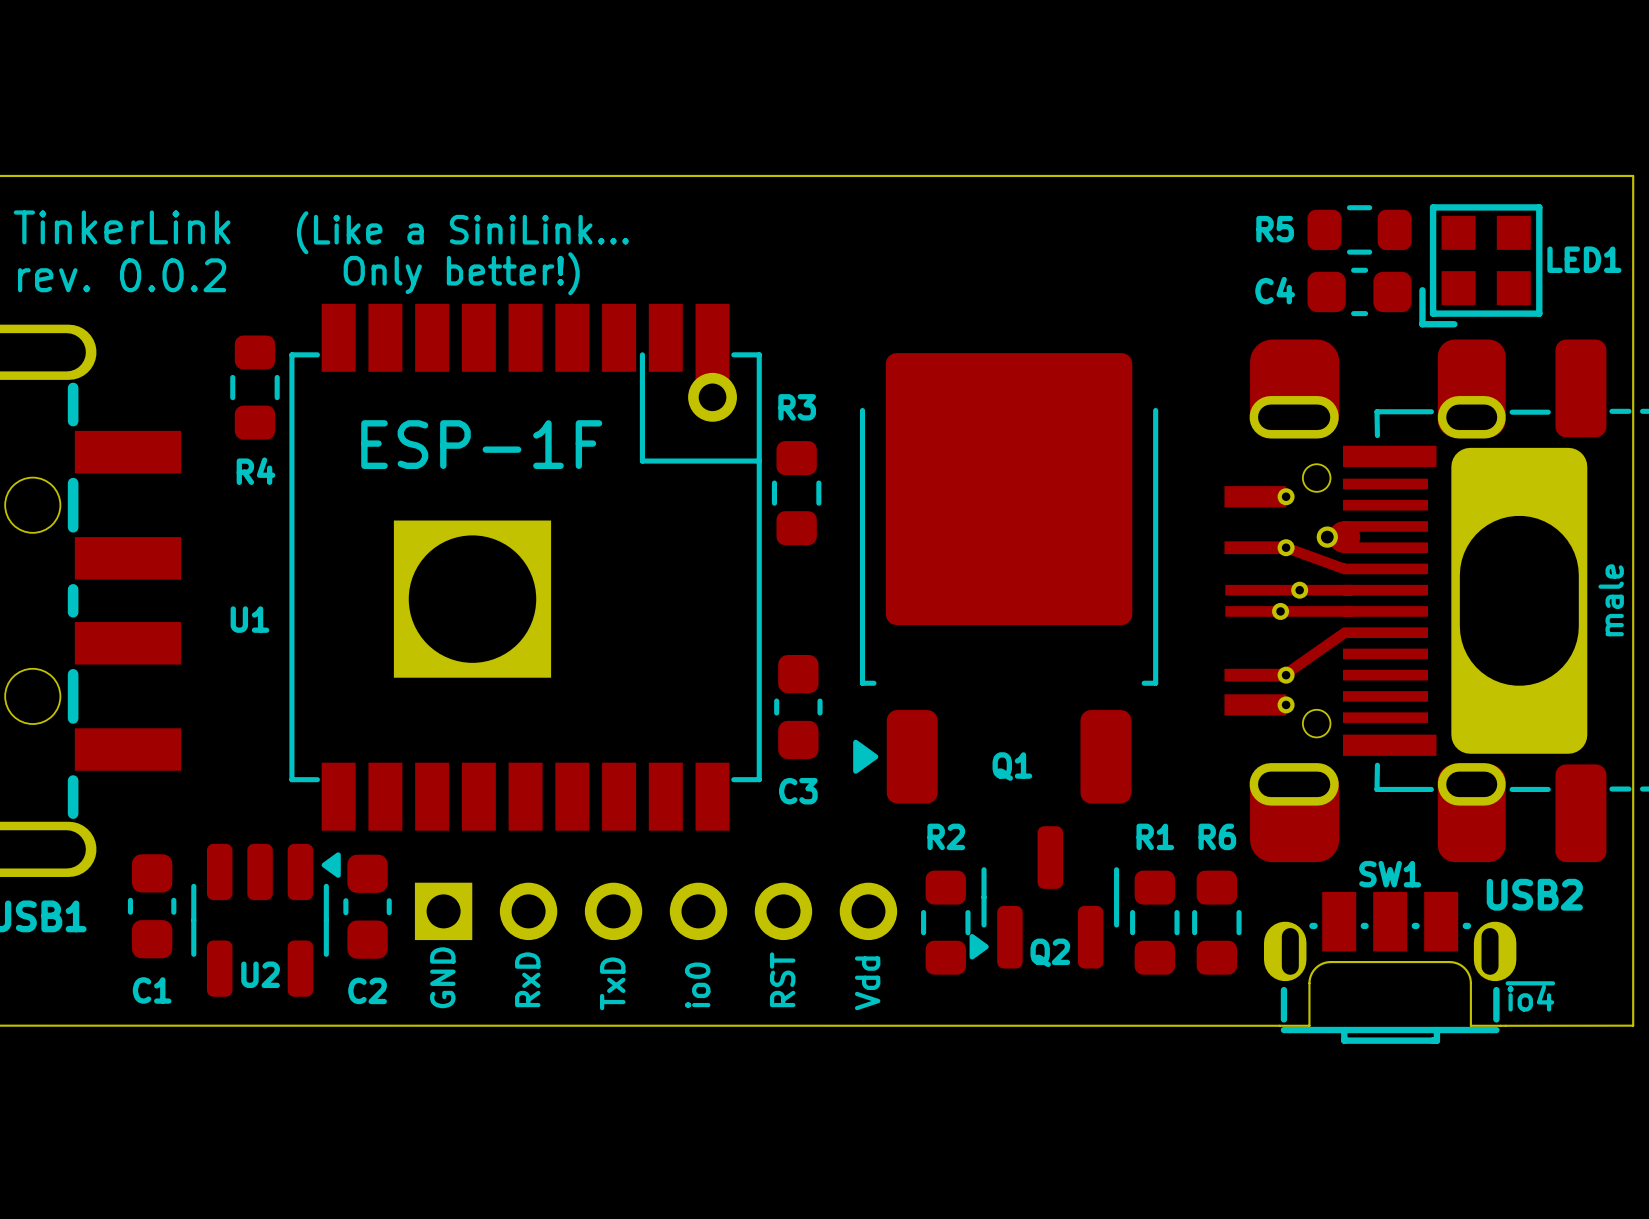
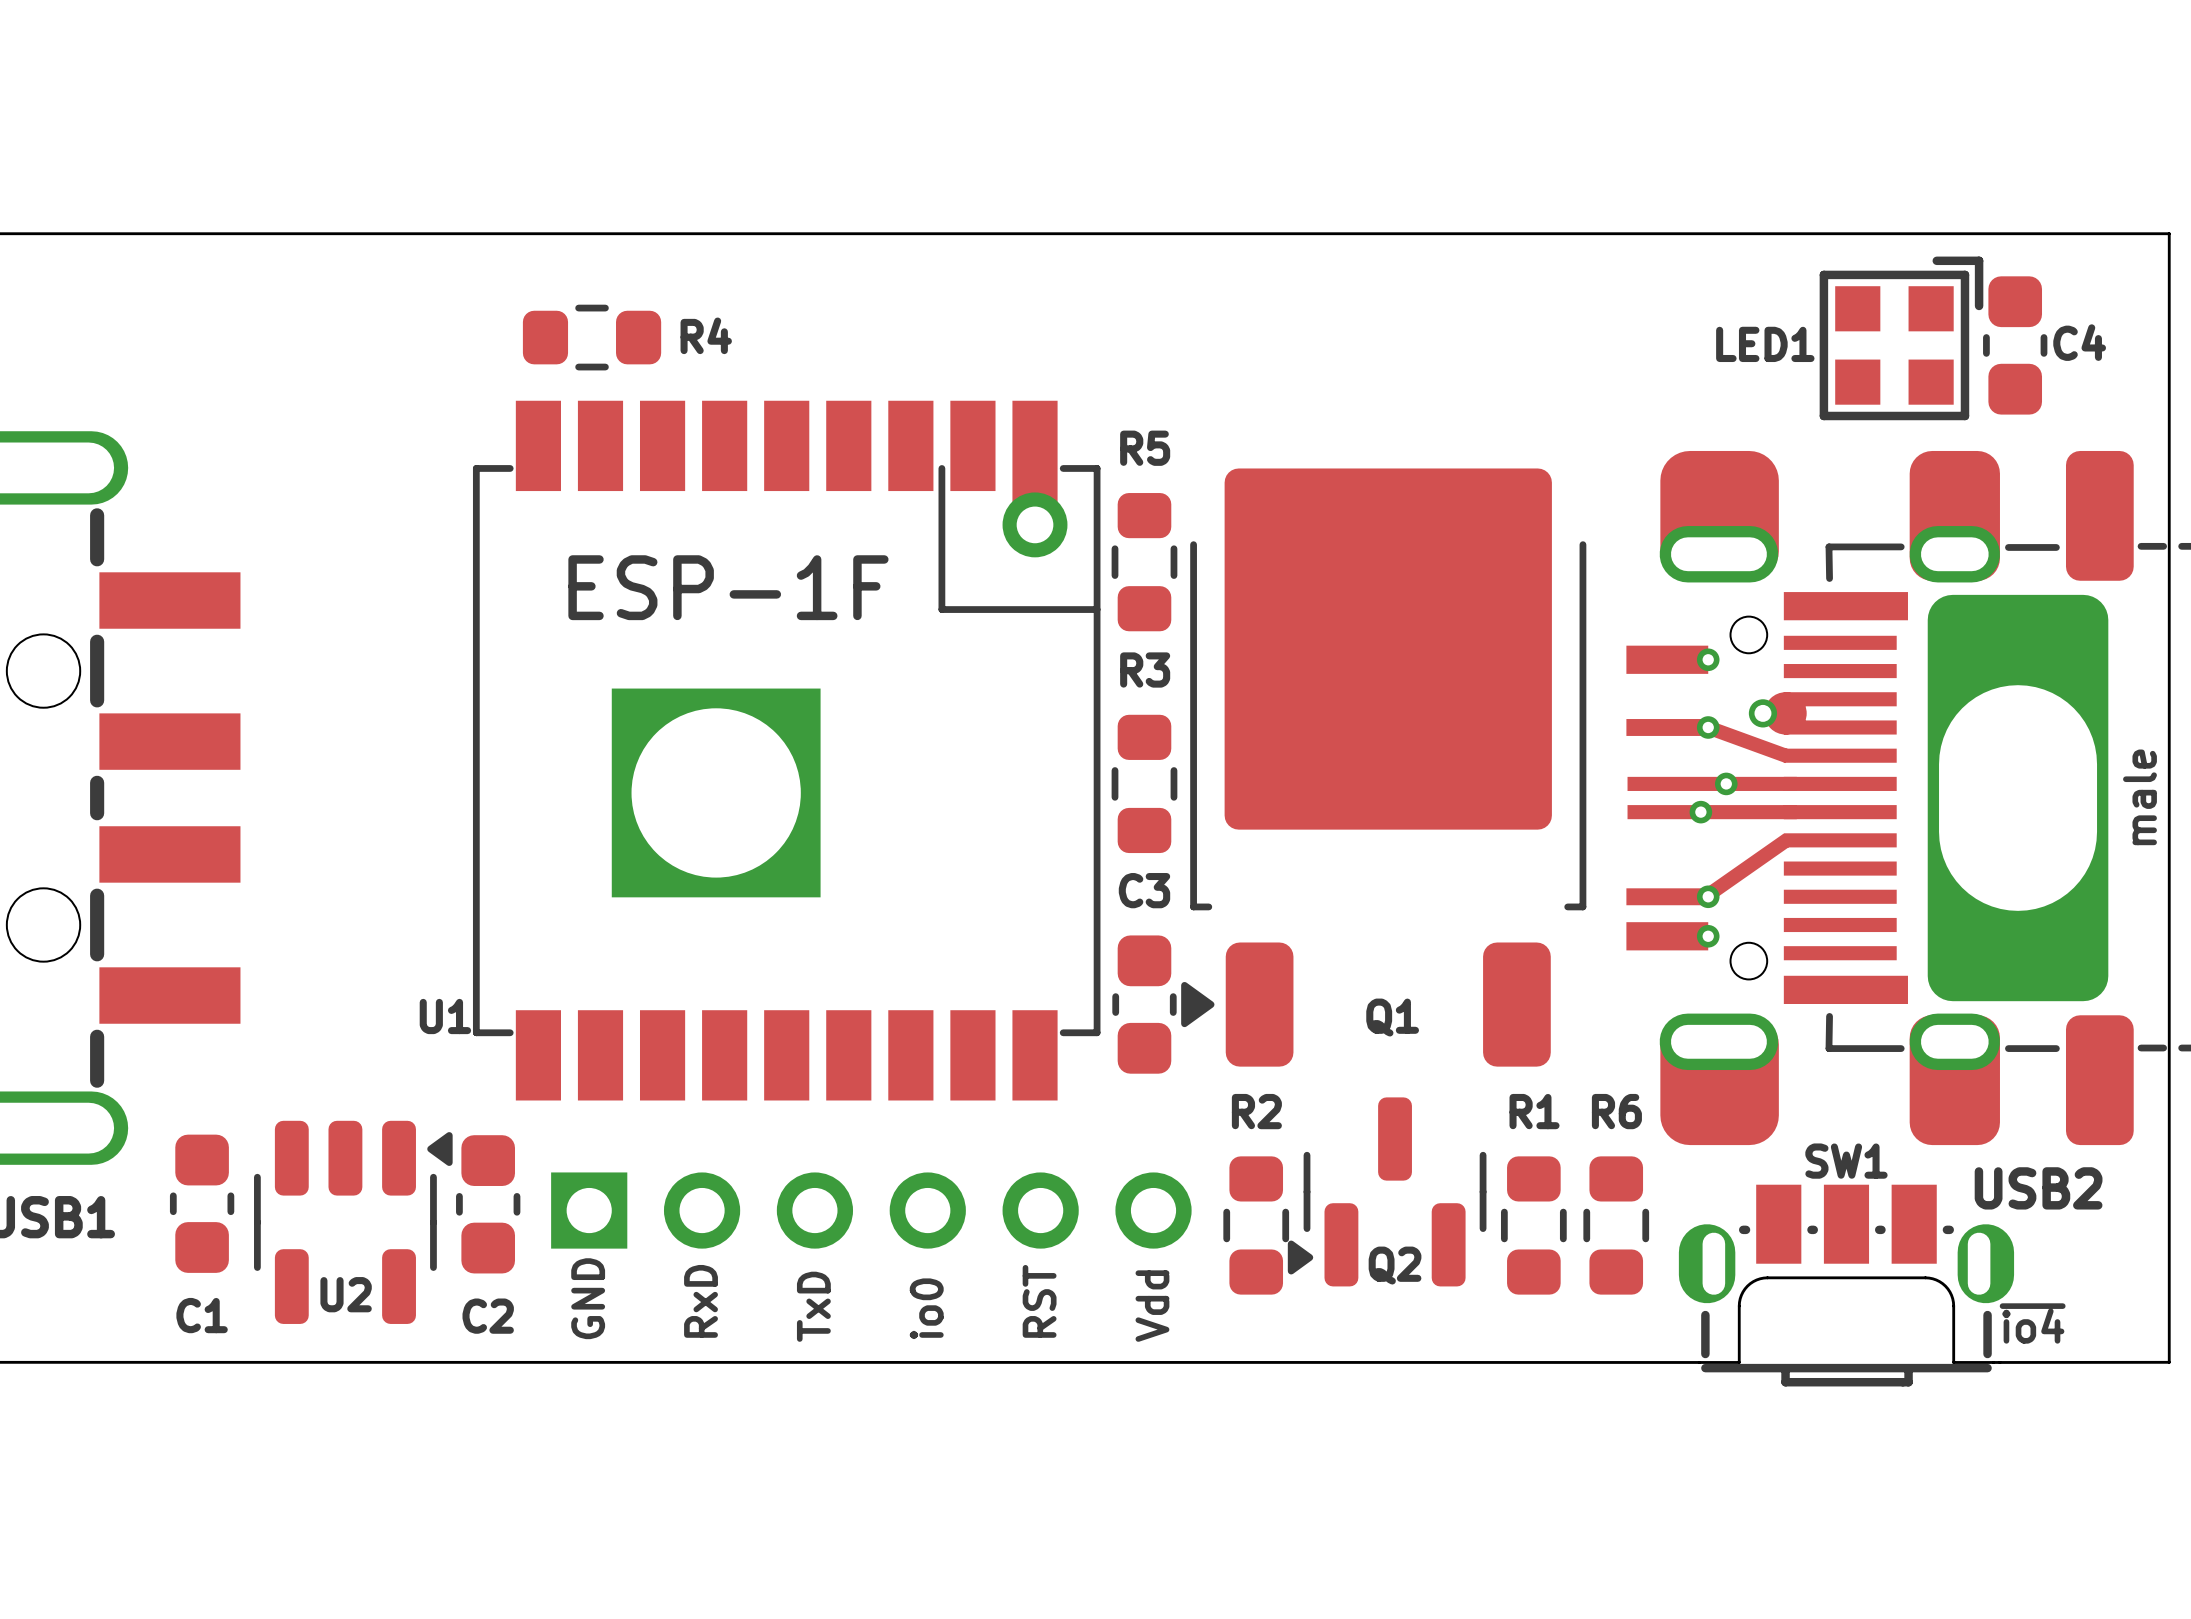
text: TinkerLink (122, 227) -> none
R5 rotation: 0° (1359, 229) -> 90° clockwise (1144, 562)
R5 position: (1359, 229) -> (1144, 562)
text: (Like a SiniLink... (462, 232) -> none
LED1 rotation: 0° (1480, 265) -> 180° (1901, 338)
text: Only better!) (461, 273) -> none
text: rev. 0.0.2 (122, 275) -> none
C4 name position: C4 (1275, 290) -> C4 (2079, 342)
C4 rotation: 0° (1359, 291) -> 90° clockwise (2015, 345)
C4 position: (1359, 291) -> (2015, 345)
R4 rotation: 0° (254, 387) -> 90° clockwise (592, 337)
R4 position: (254, 387) -> (592, 337)
R4 name position: R4 (255, 471) -> R4 (706, 335)
R3 position: (796, 493) -> (1144, 783)
U1 position: (525, 567) -> (786, 750)
Q1 position: (1005, 578) -> (1383, 767)
U1 name position: U1 (249, 619) -> U1 (445, 1016)
C3 position: (798, 707) -> (1144, 1004)
C3 name position: C3 (798, 791) -> C3 (1144, 890)

